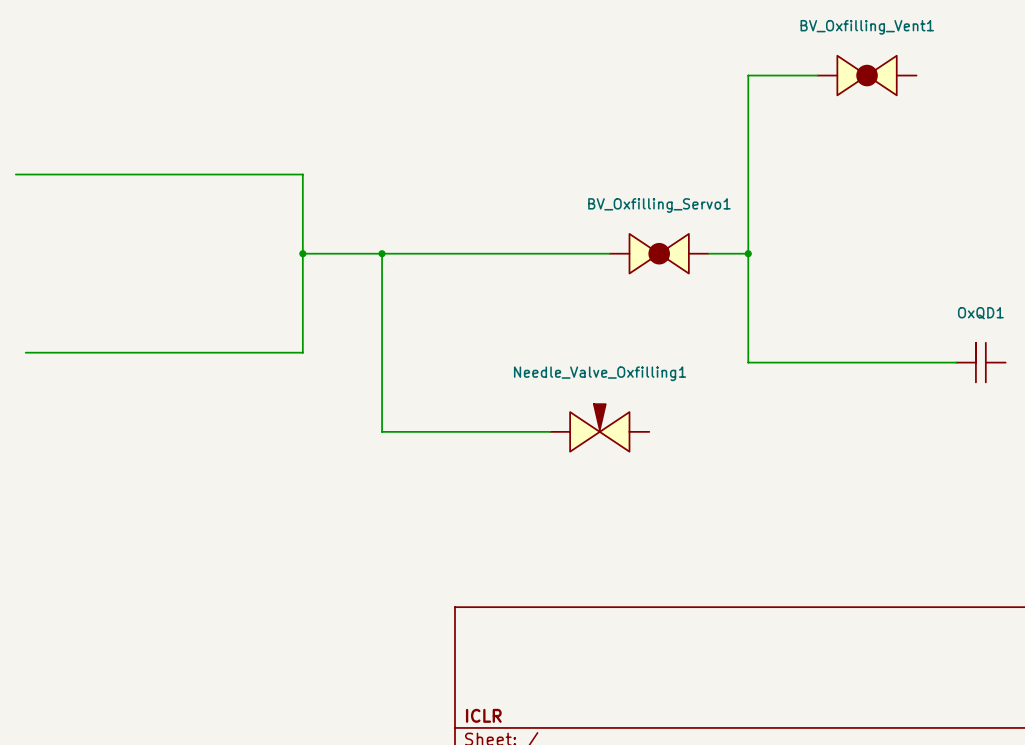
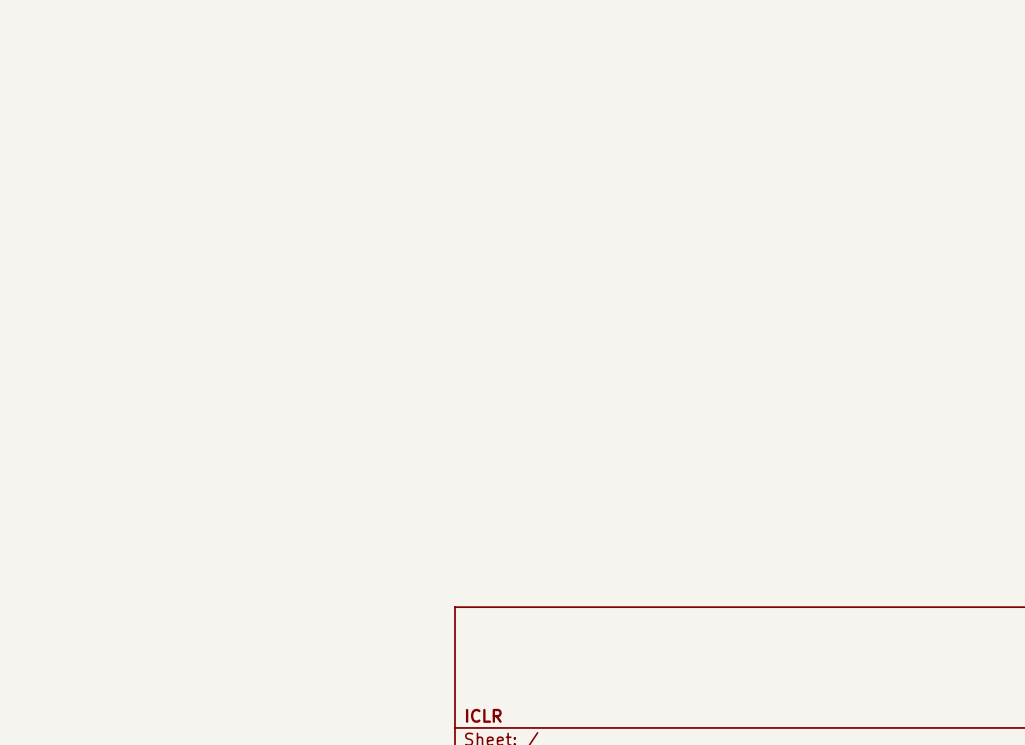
wire: (817, 75) (748, 75) (748, 362) (956, 362) -> none
BV_Oxfilling_Vent1: (867, 75) -> none
wire: (15, 174) (302, 174) (302, 352) (25, 352) -> none
wire: (302, 253) (609, 253) -> none
junction: (302, 253) -> none
wire: (382, 253) (382, 431) (550, 431) -> none
junction: (382, 253) -> none
BV_Oxfilling_Servo1: (659, 253) -> none
wire: (708, 253) (748, 253) -> none
junction: (748, 253) -> none
OxQD1: (980, 362) -> none
Needle_Valve_Oxfilling1: (599, 427) -> none

